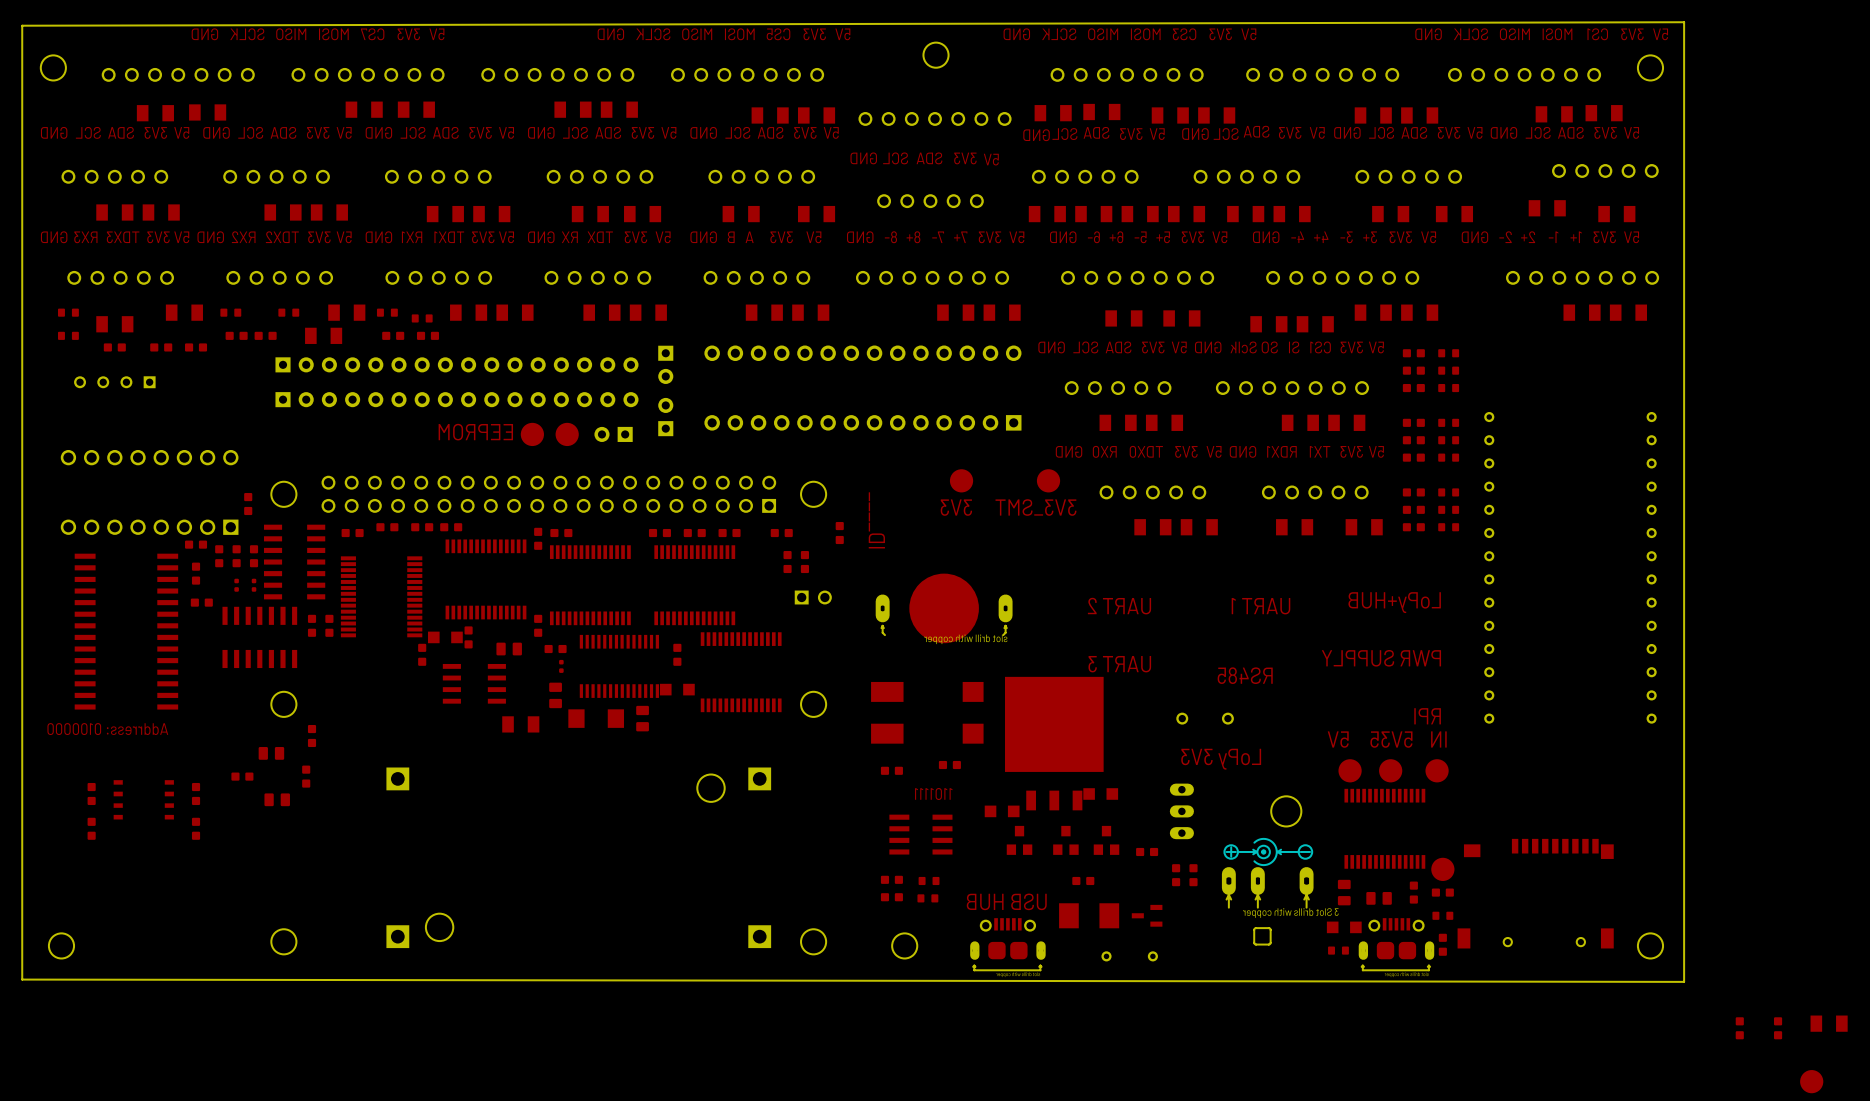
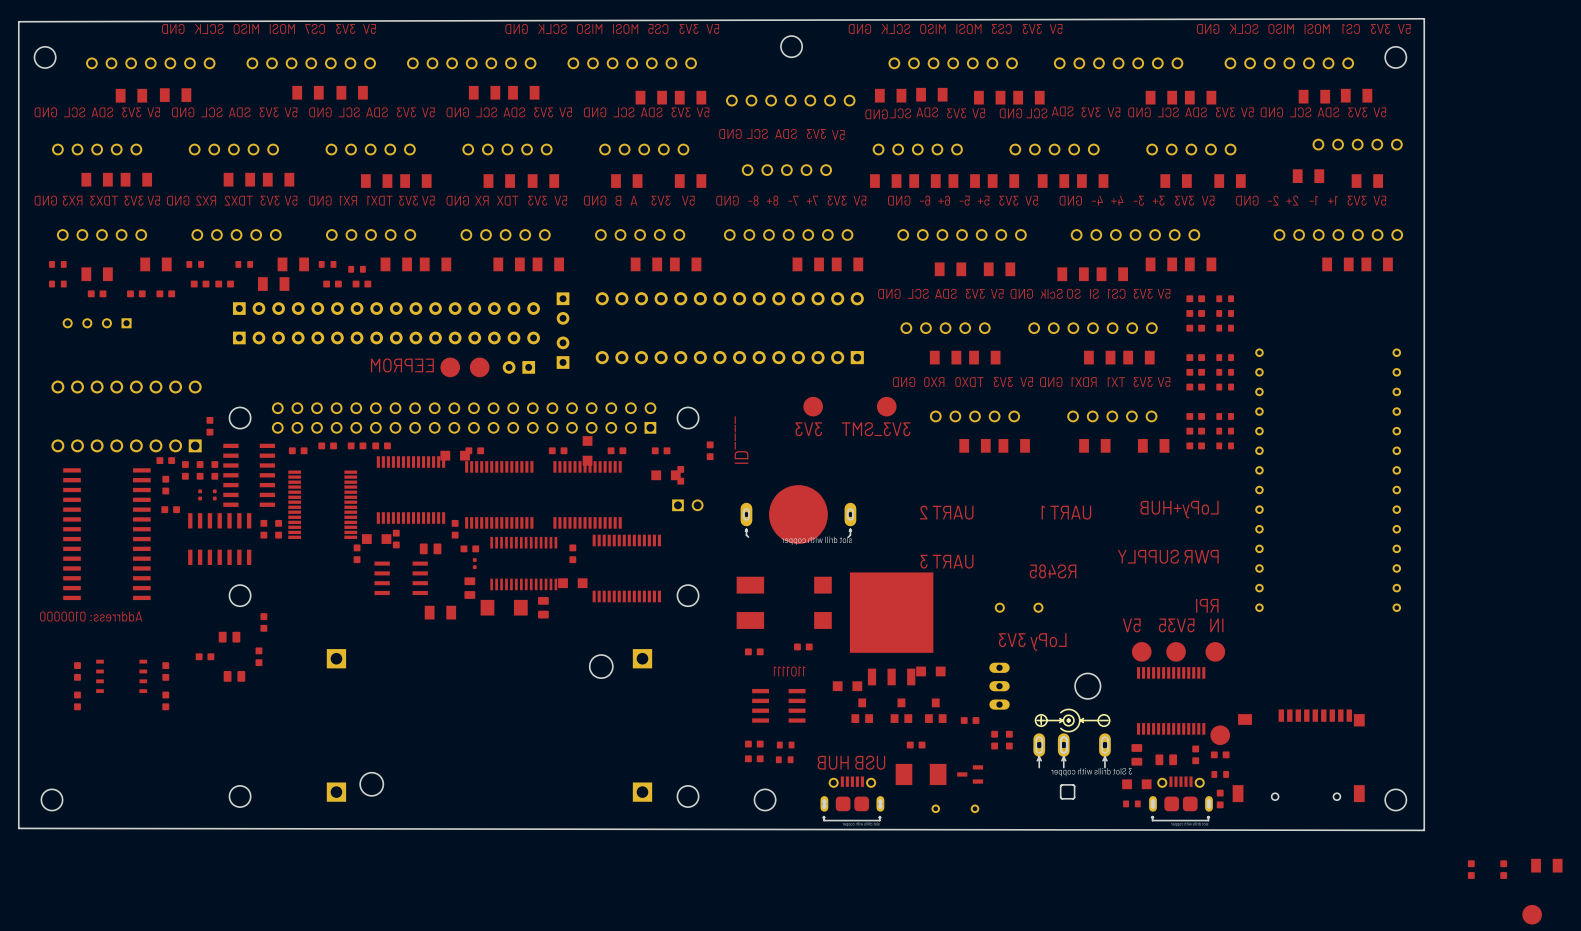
part footprint: [534, 527, 543, 550] -> [440, 450, 470, 461]
part footprint: [683, 528, 706, 538] -> [582, 436, 593, 466]
part footprint: [783, 551, 792, 574] -> [651, 470, 681, 481]

